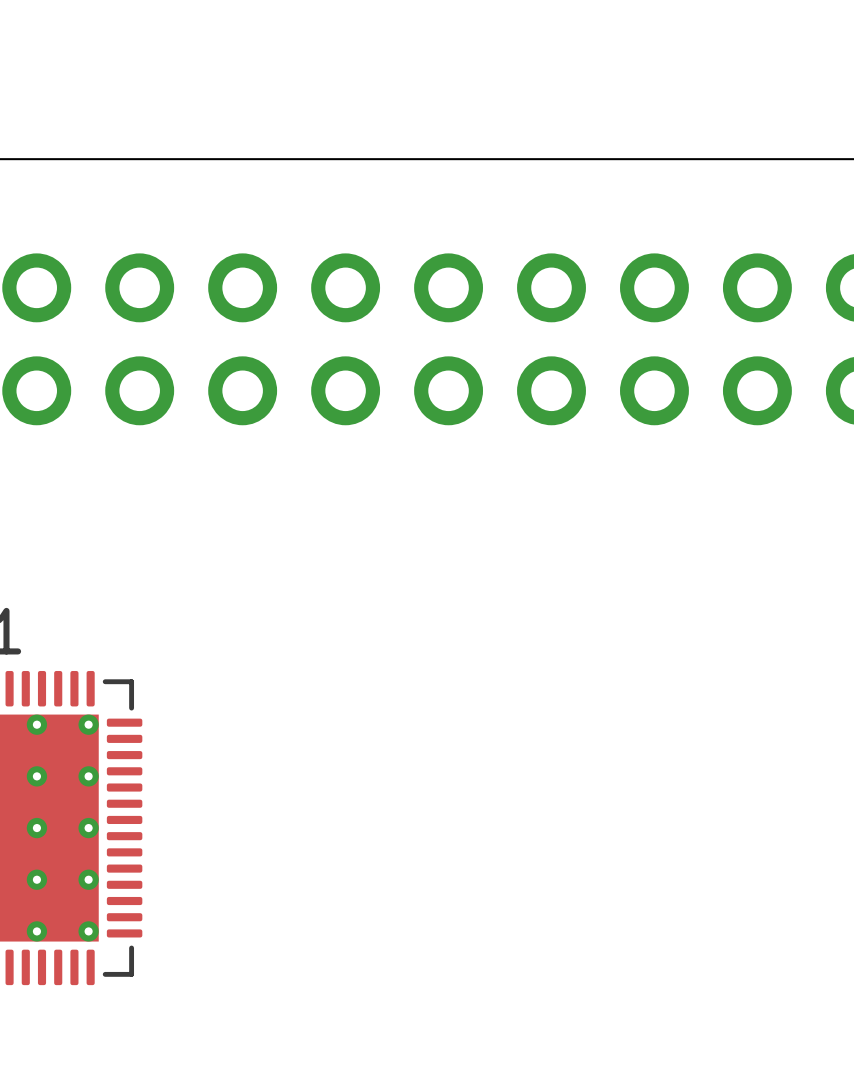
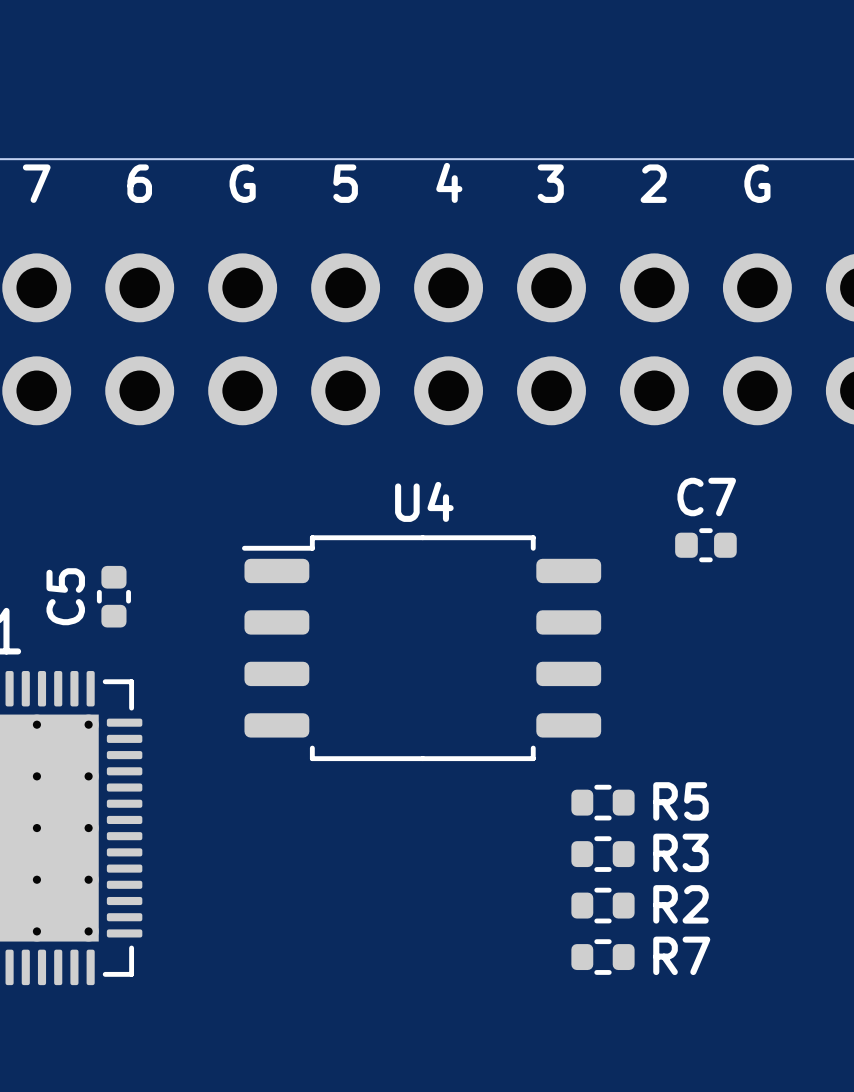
text: none -> 4 (449, 182)
text: none -> 7 (36, 183)
text: none -> 6 (139, 183)
text: none -> G (242, 183)
text: none -> 5 (345, 183)
text: none -> 3 (550, 183)
text: none -> 2 (653, 183)
text: none -> G (757, 183)
C7: none -> (705, 545)
C5: none -> (113, 596)
U4: none -> (421, 648)
R5: none -> (602, 802)
R3: none -> (602, 854)
R2: none -> (602, 905)
R7: none -> (602, 957)

